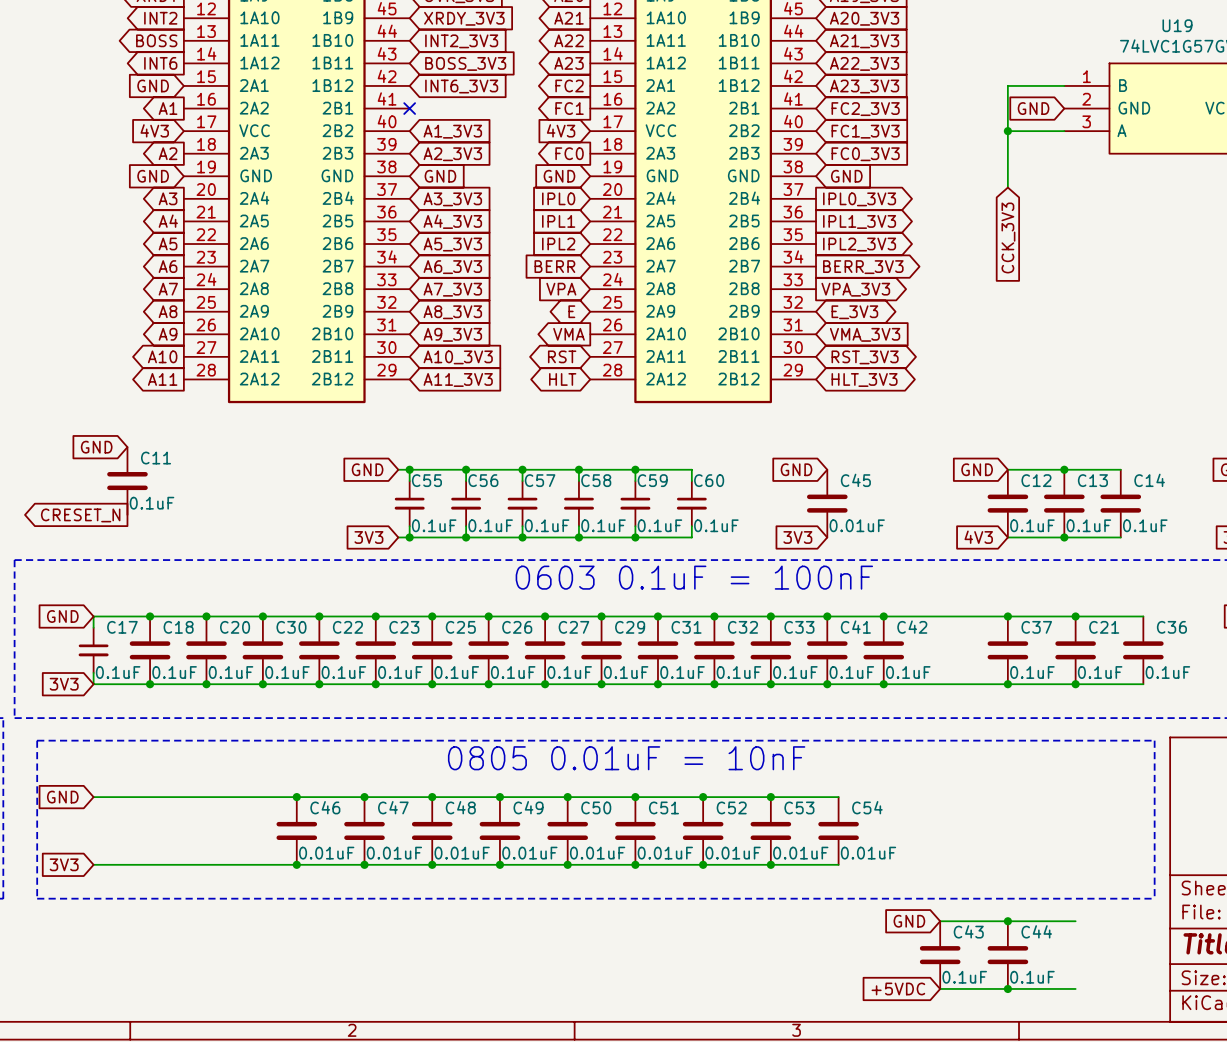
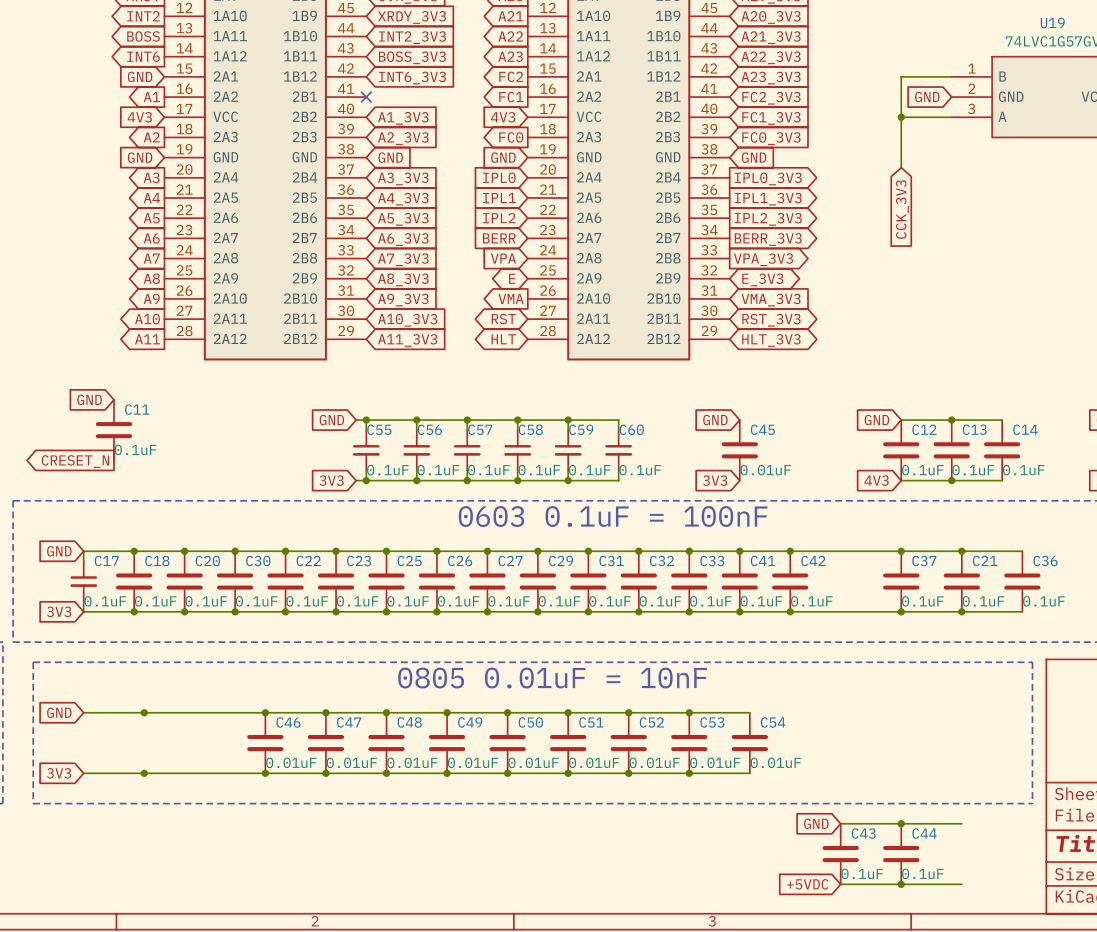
junction: none -> (144, 712)
junction: none -> (144, 773)

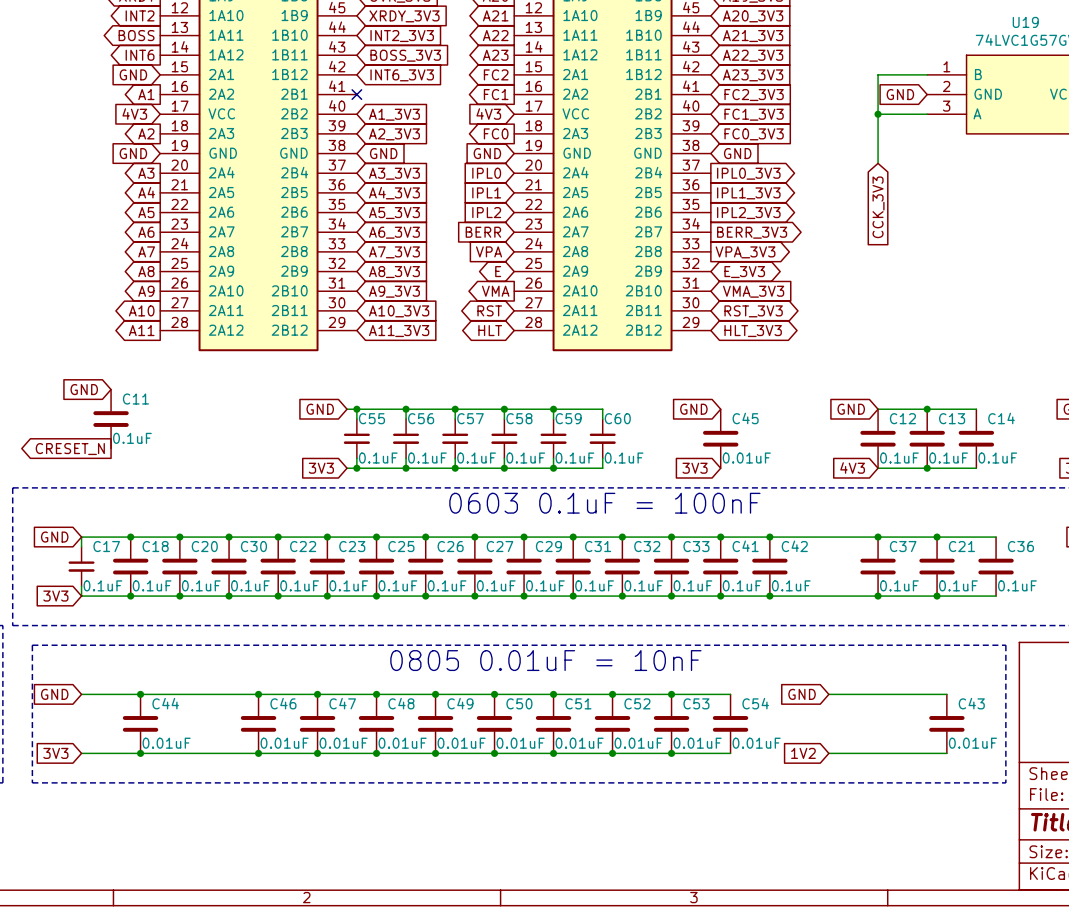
global label: none -> 1V2 (803, 753)
global label position: GND (816, 823) -> GND (802, 694)
wire: (840, 823) (961, 823) -> (828, 753) (946, 753)
junction: (901, 823) -> none
C43 position: (840, 854) -> (946, 723)
C44 position: (901, 854) -> (140, 723)
C43 value: 0.1uF (862, 873) -> 0.01uF (972, 743)
C44 value: 0.1uF (922, 873) -> 0.01uF (166, 743)
global label: +5VDC (807, 884) -> none
wire: (840, 884) (961, 884) -> (828, 694) (946, 694)
junction: (901, 884) -> none

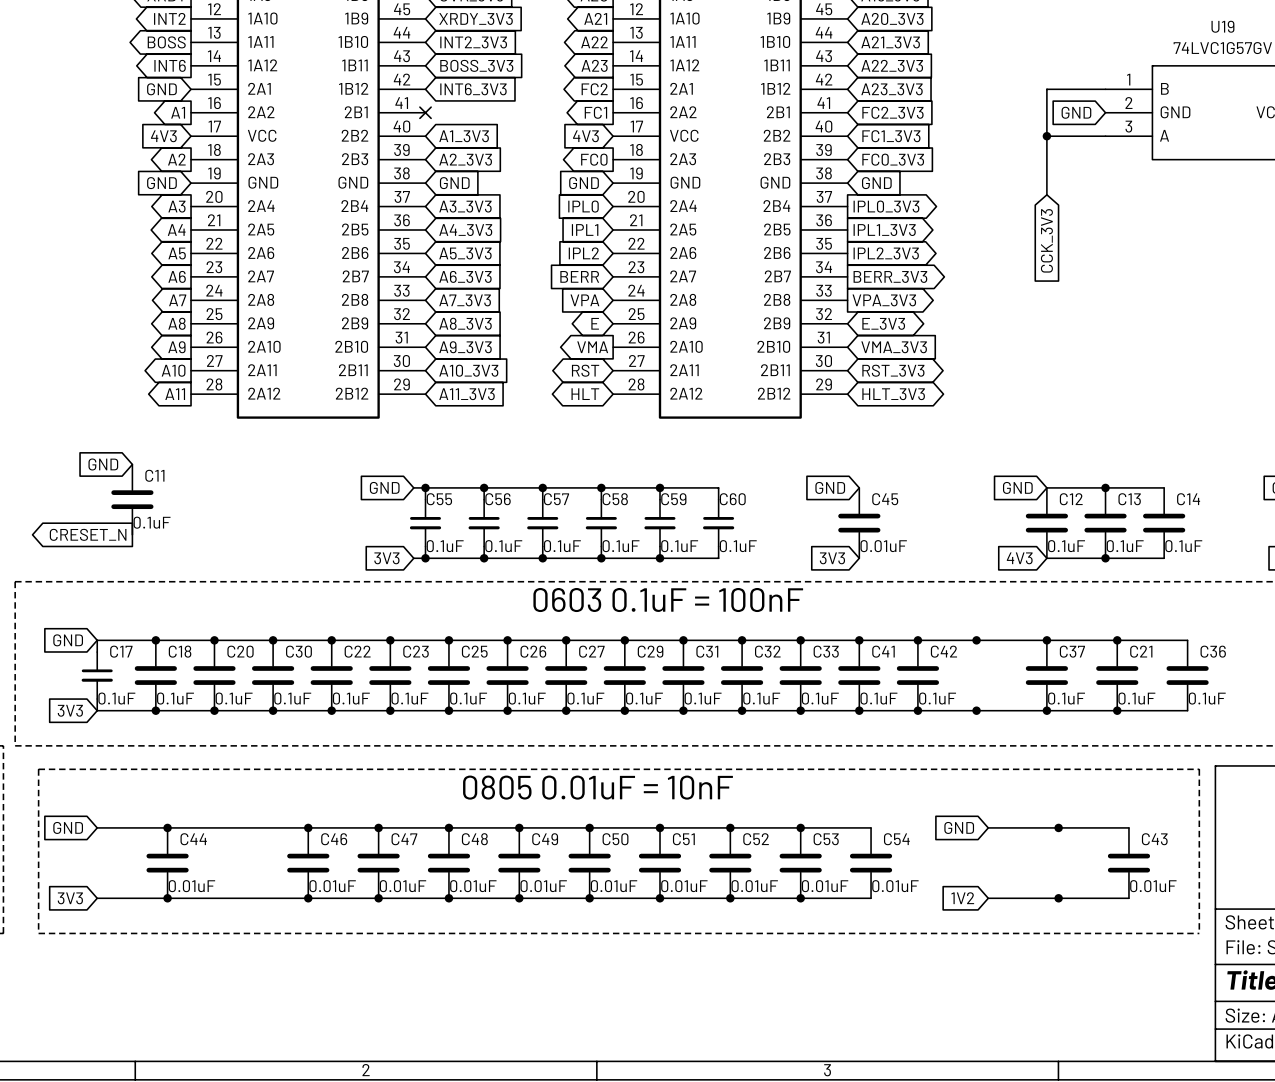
junction: none -> (976, 640)
junction: none -> (976, 710)
junction: none -> (1058, 827)
junction: none -> (1058, 898)

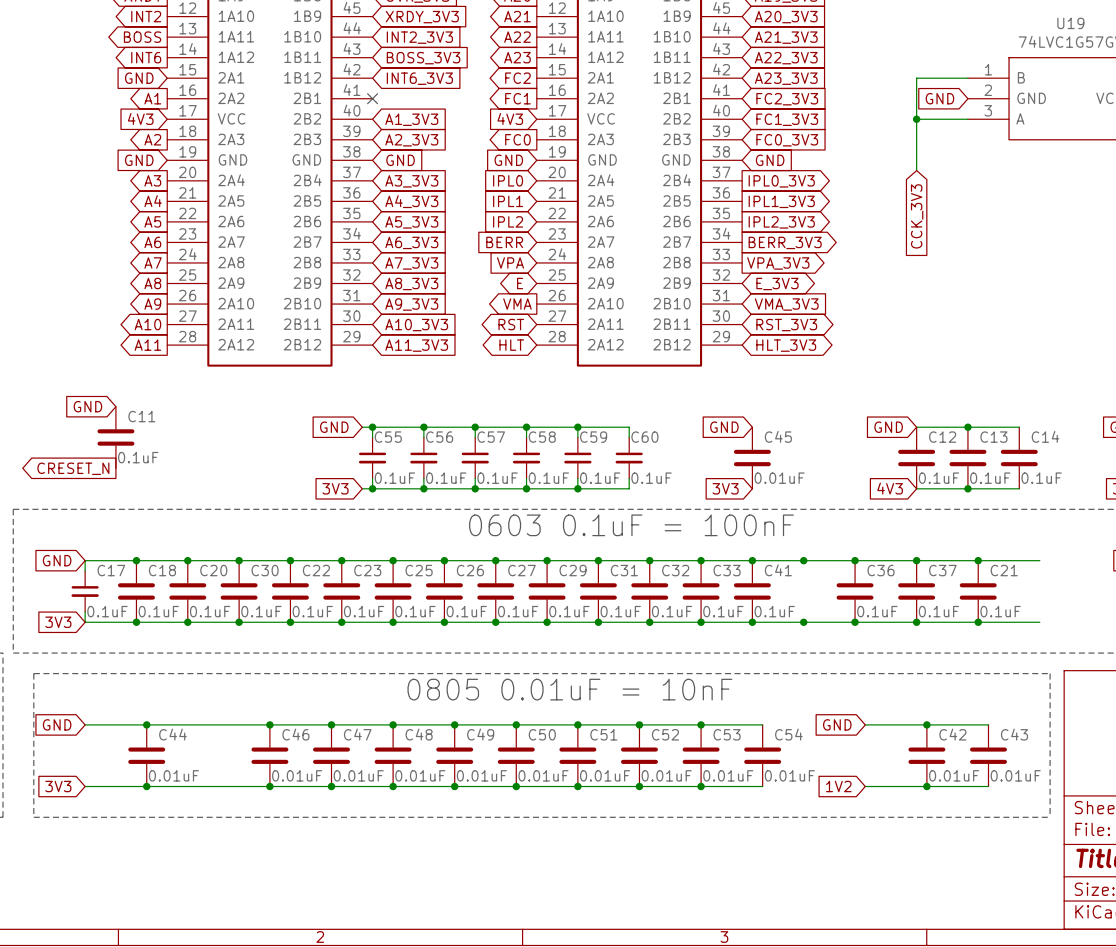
C42 position: (917, 675) -> (926, 755)
C36 position: (1187, 675) -> (855, 591)
C42 value: 0.1uF (937, 698) -> 0.01uF (954, 775)

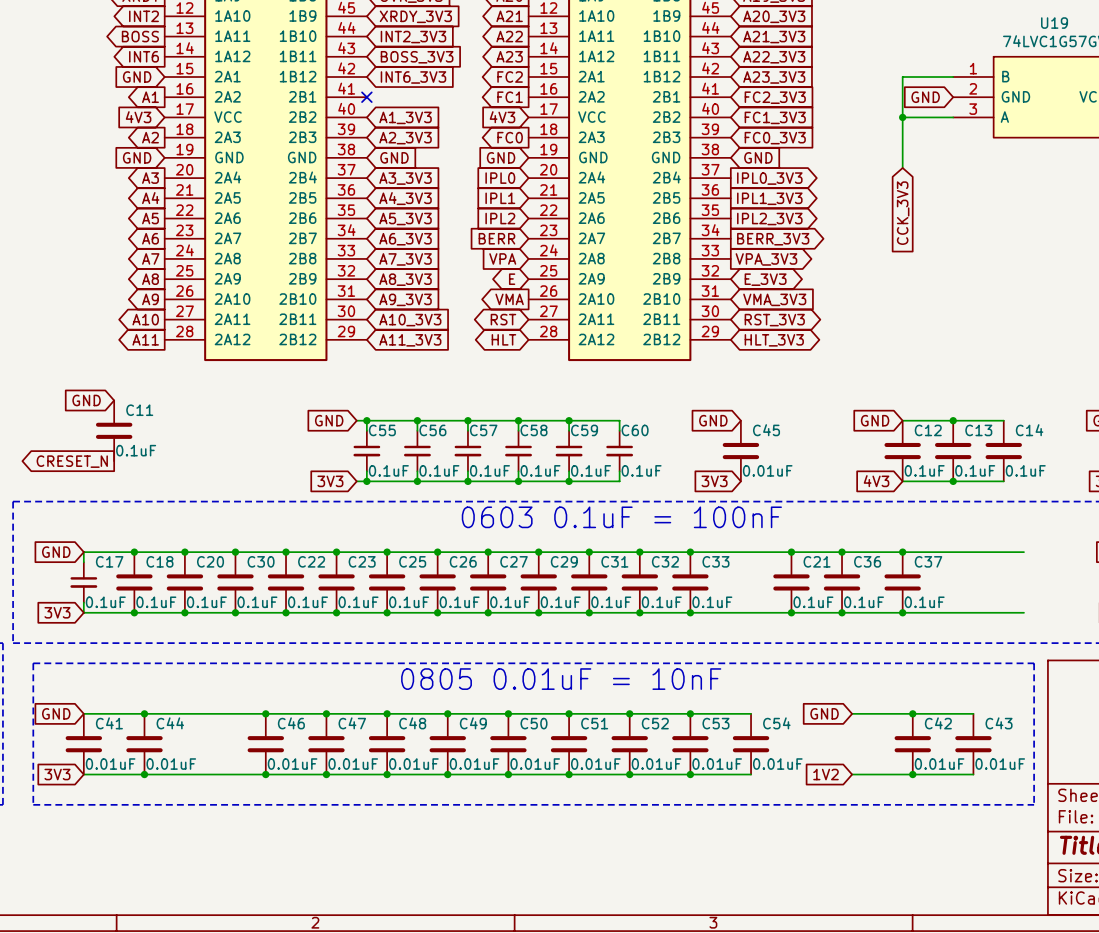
junction: (752, 560) -> none
junction: (978, 560) -> none
C41 position: (752, 591) -> (83, 744)
C21 position: (978, 591) -> (791, 582)
C41 value: 0.1uF (774, 611) -> 0.01uF (110, 764)
junction: (752, 622) -> none
junction: (978, 622) -> none

